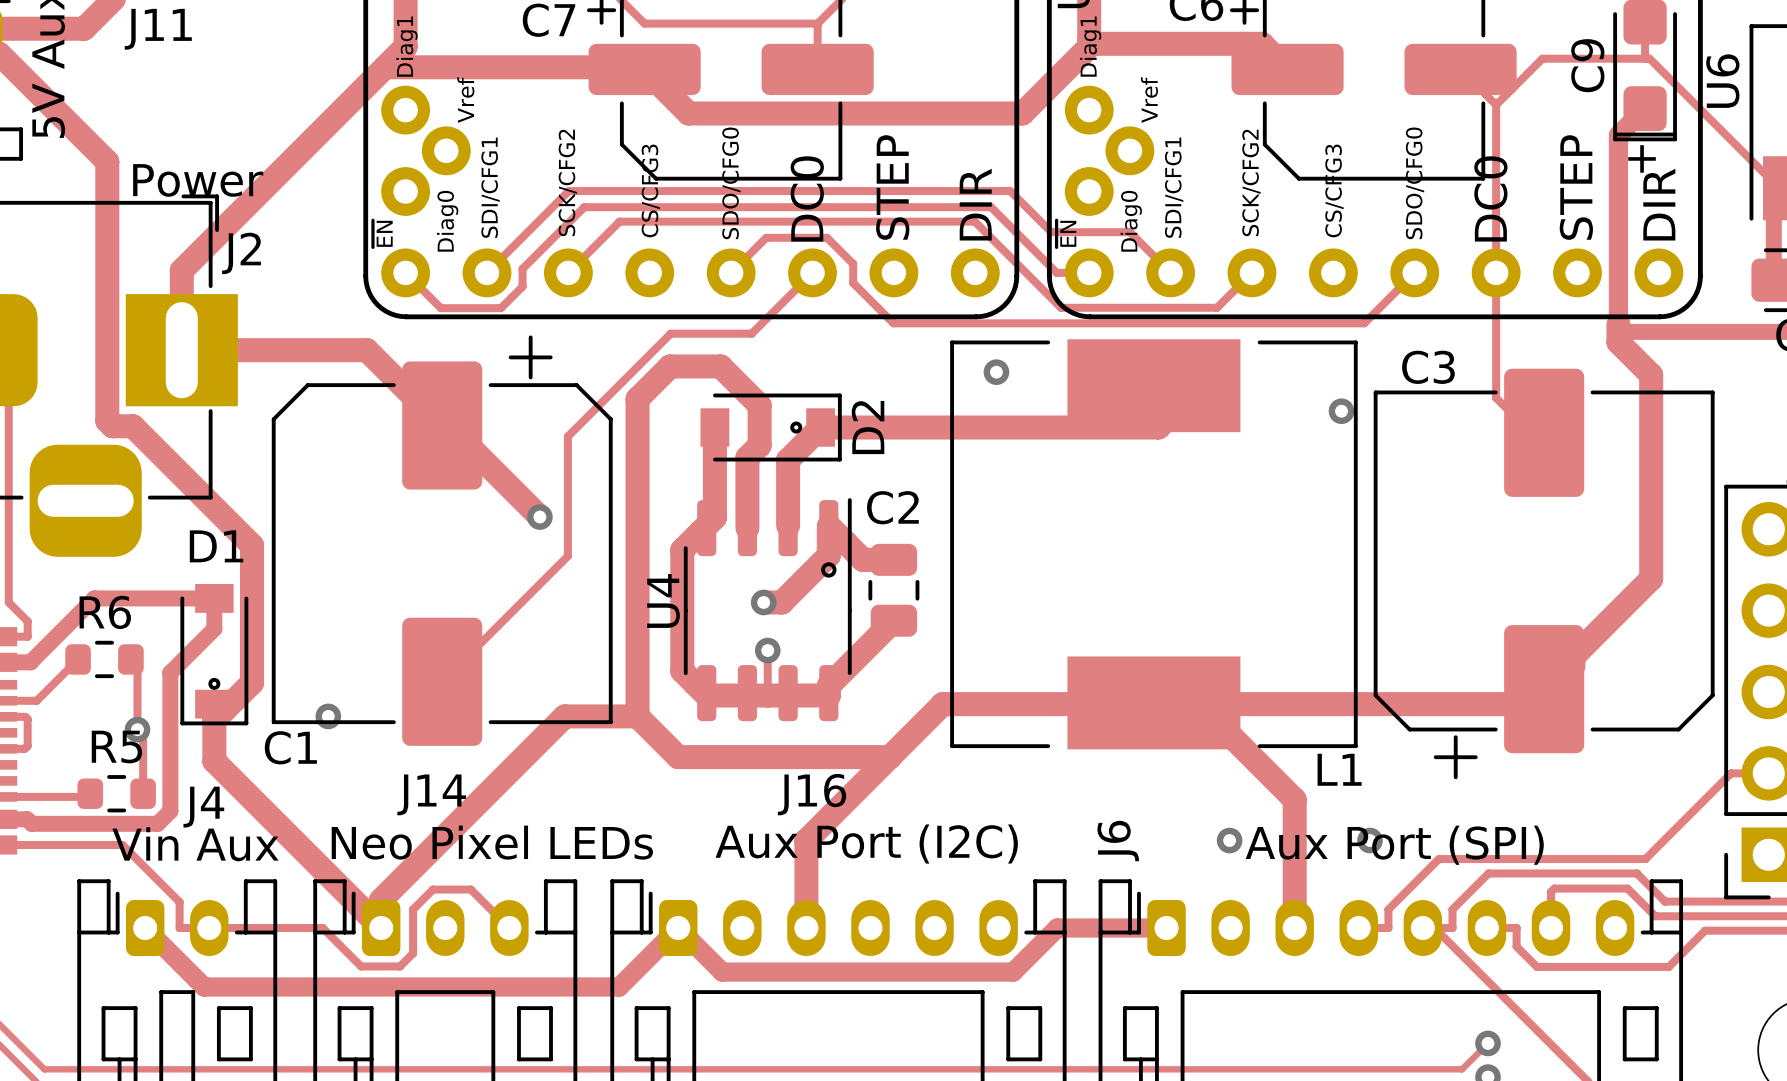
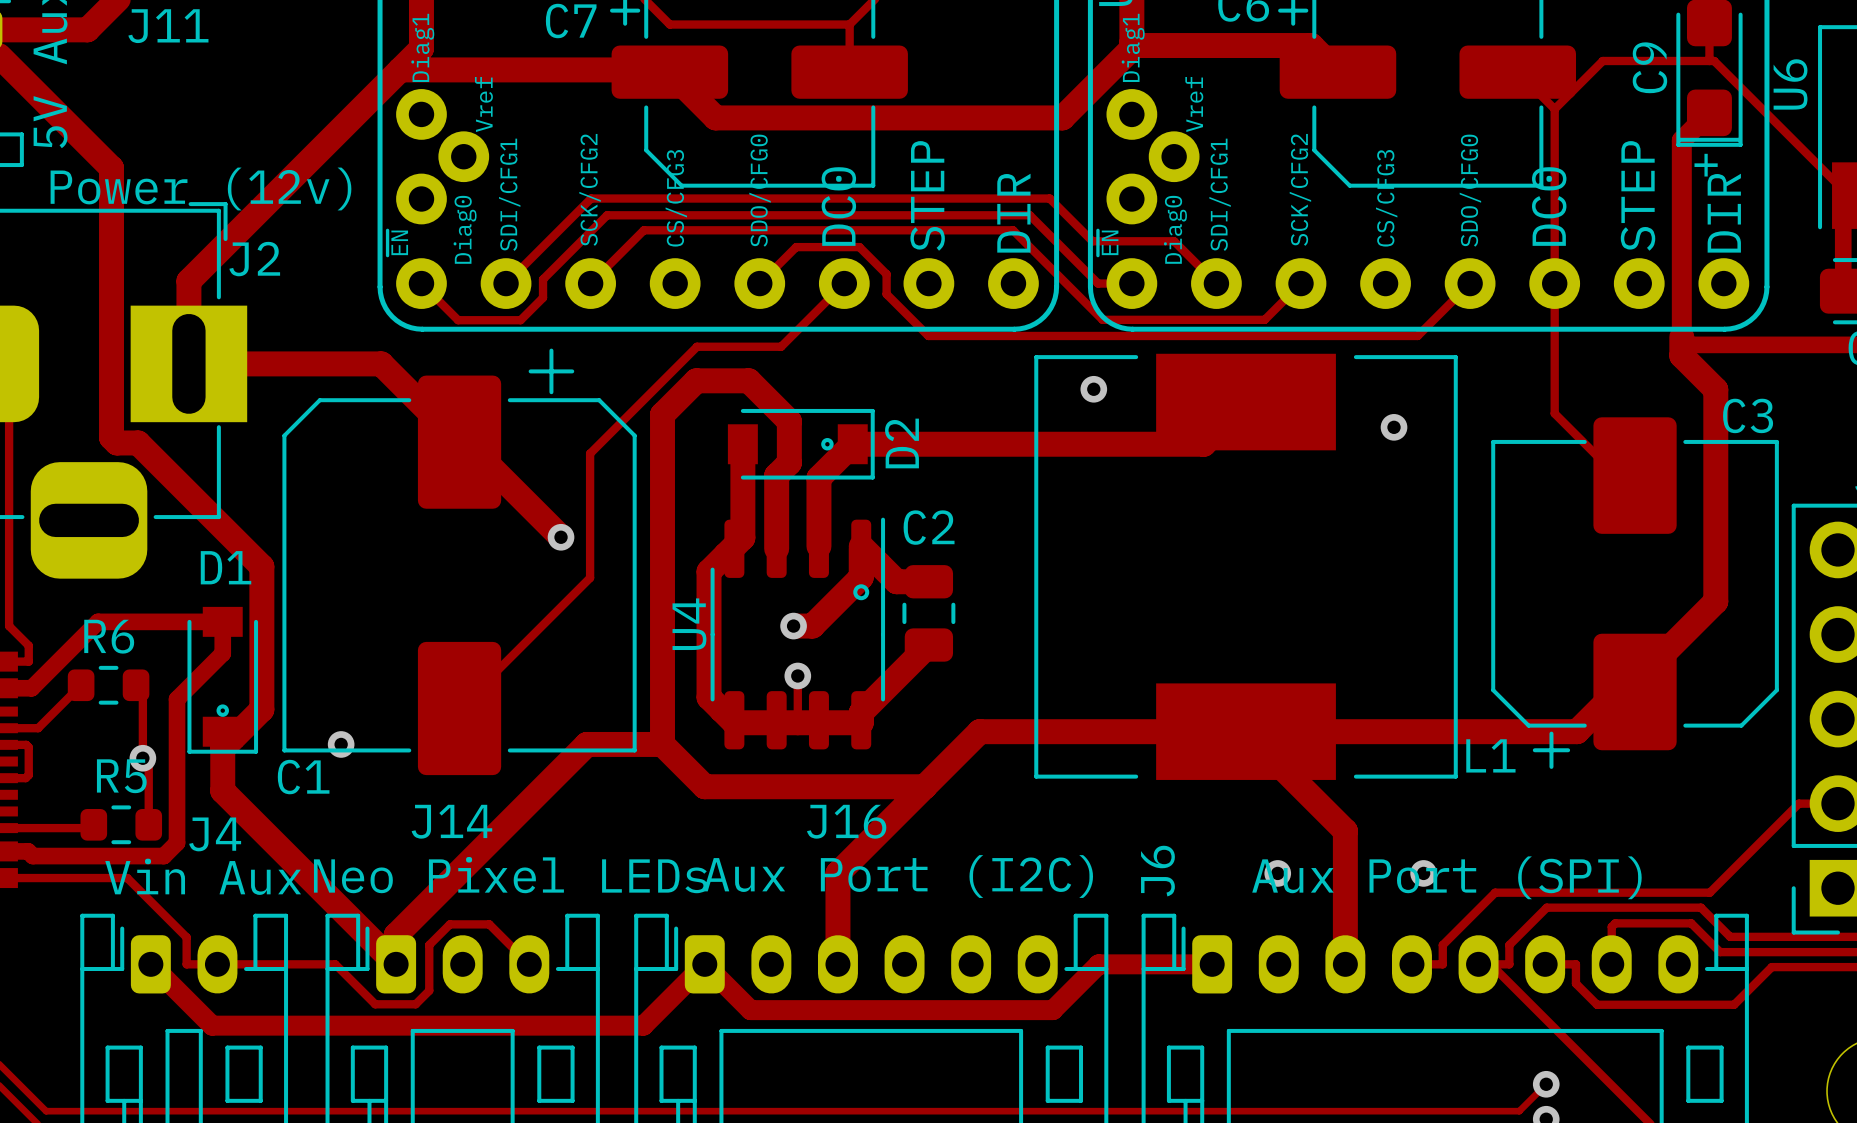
J2 value: Power (198, 180) -> Power (12v) (200, 188)
C3 name position: C3 (1428, 367) -> C3 (1748, 415)
C3 footprint: [1373, 368, 1715, 780] -> [1491, 417, 1779, 769]
via position: (996, 372) -> (1093, 389)
L1 position: (1153, 544) -> (1246, 566)
L1 name position: L1 (1339, 769) -> L1 (1490, 755)

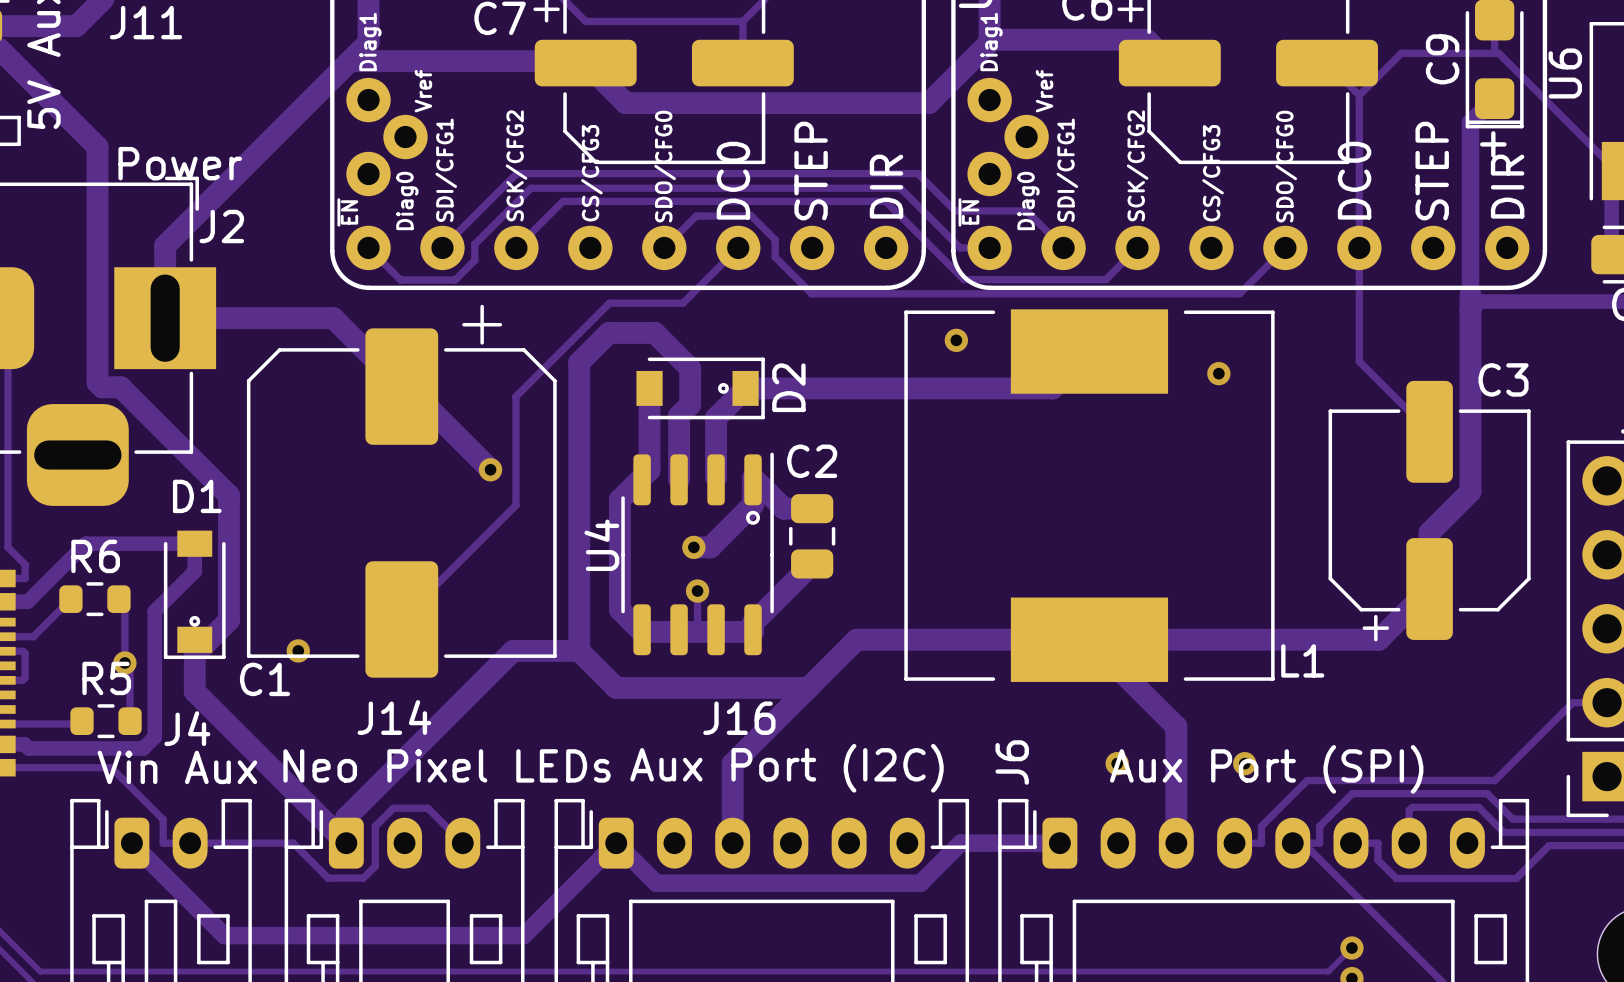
J2 value: Power (12v) (200, 188) -> Power (180, 163)
track: (1681, 355) (1715, 389) (1715, 601) (1635, 682) (1635, 691) -> (1470, 311) (1470, 491) (1429, 532) (1429, 589)
C3 footprint: [1491, 417, 1779, 769] -> [1328, 380, 1531, 642]
track: (212, 1025) (643, 1025) -> (185, 896) (224, 935) (523, 935) (562, 896)

